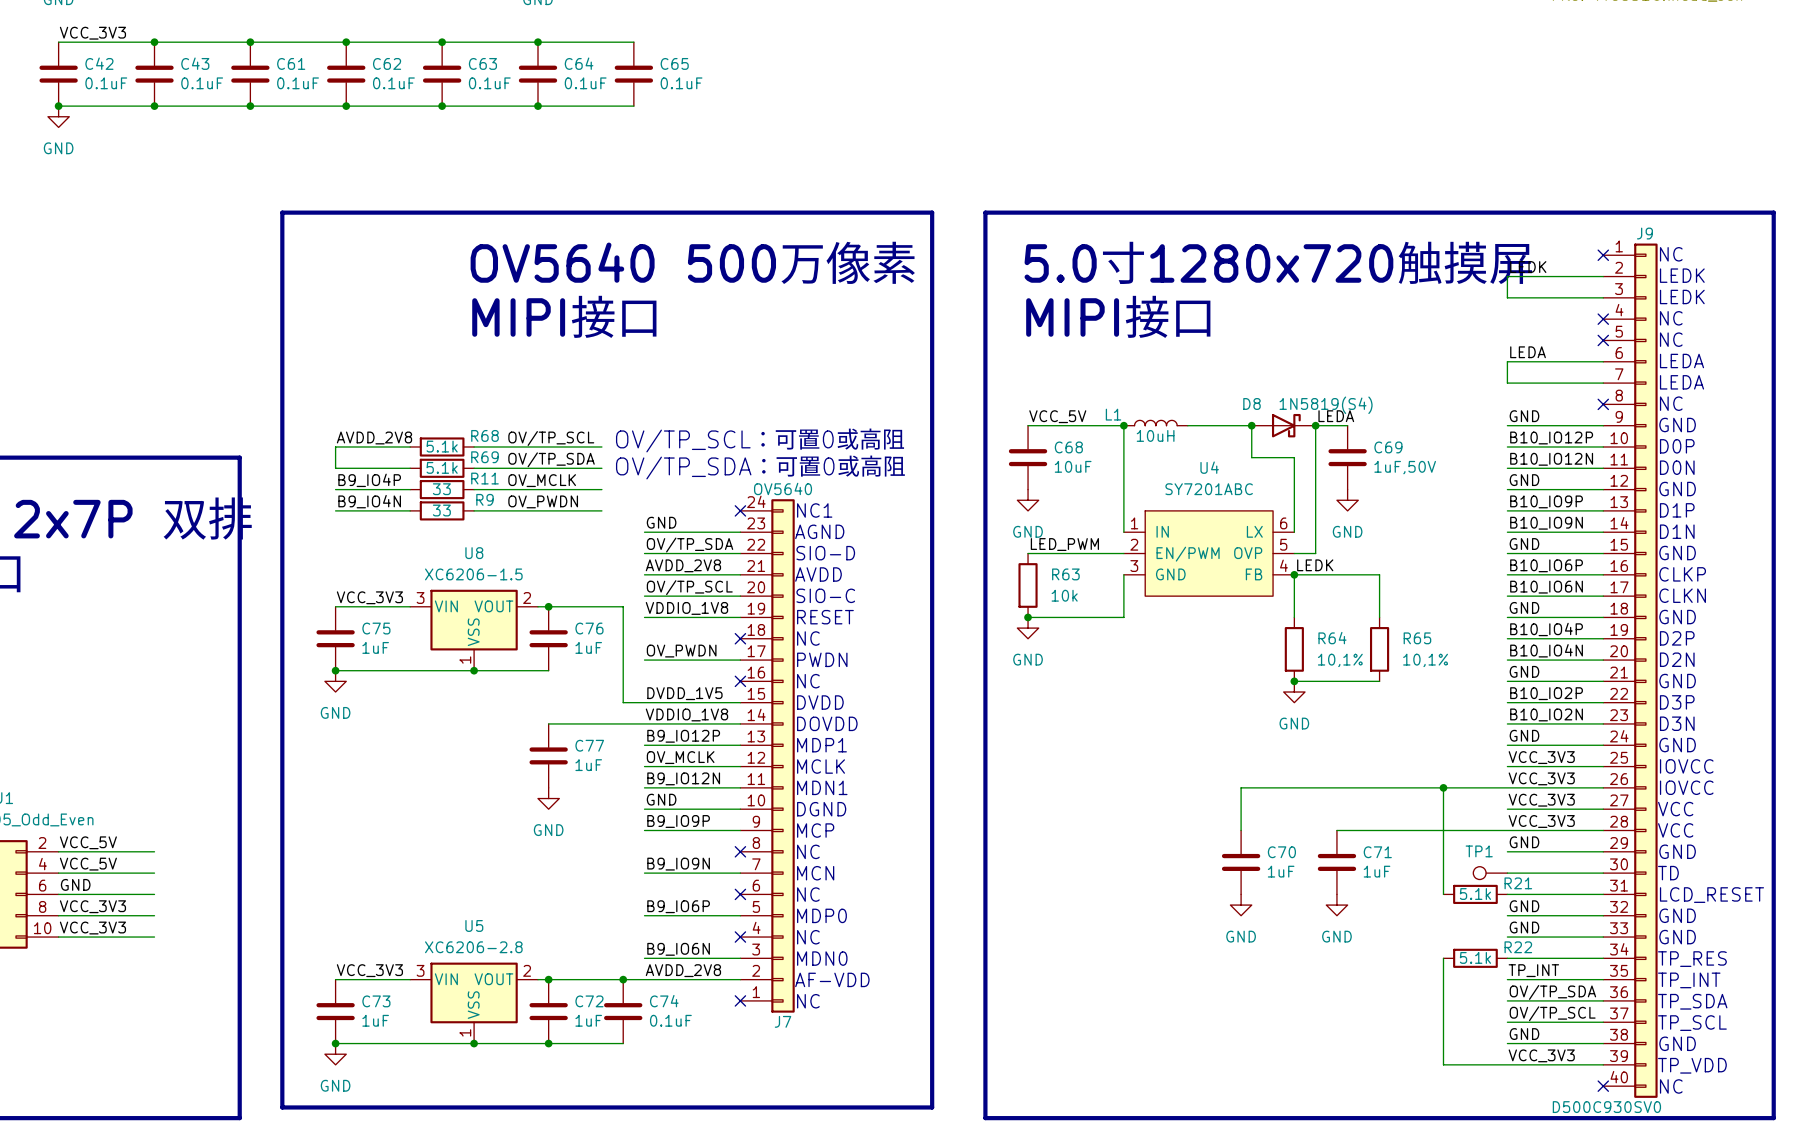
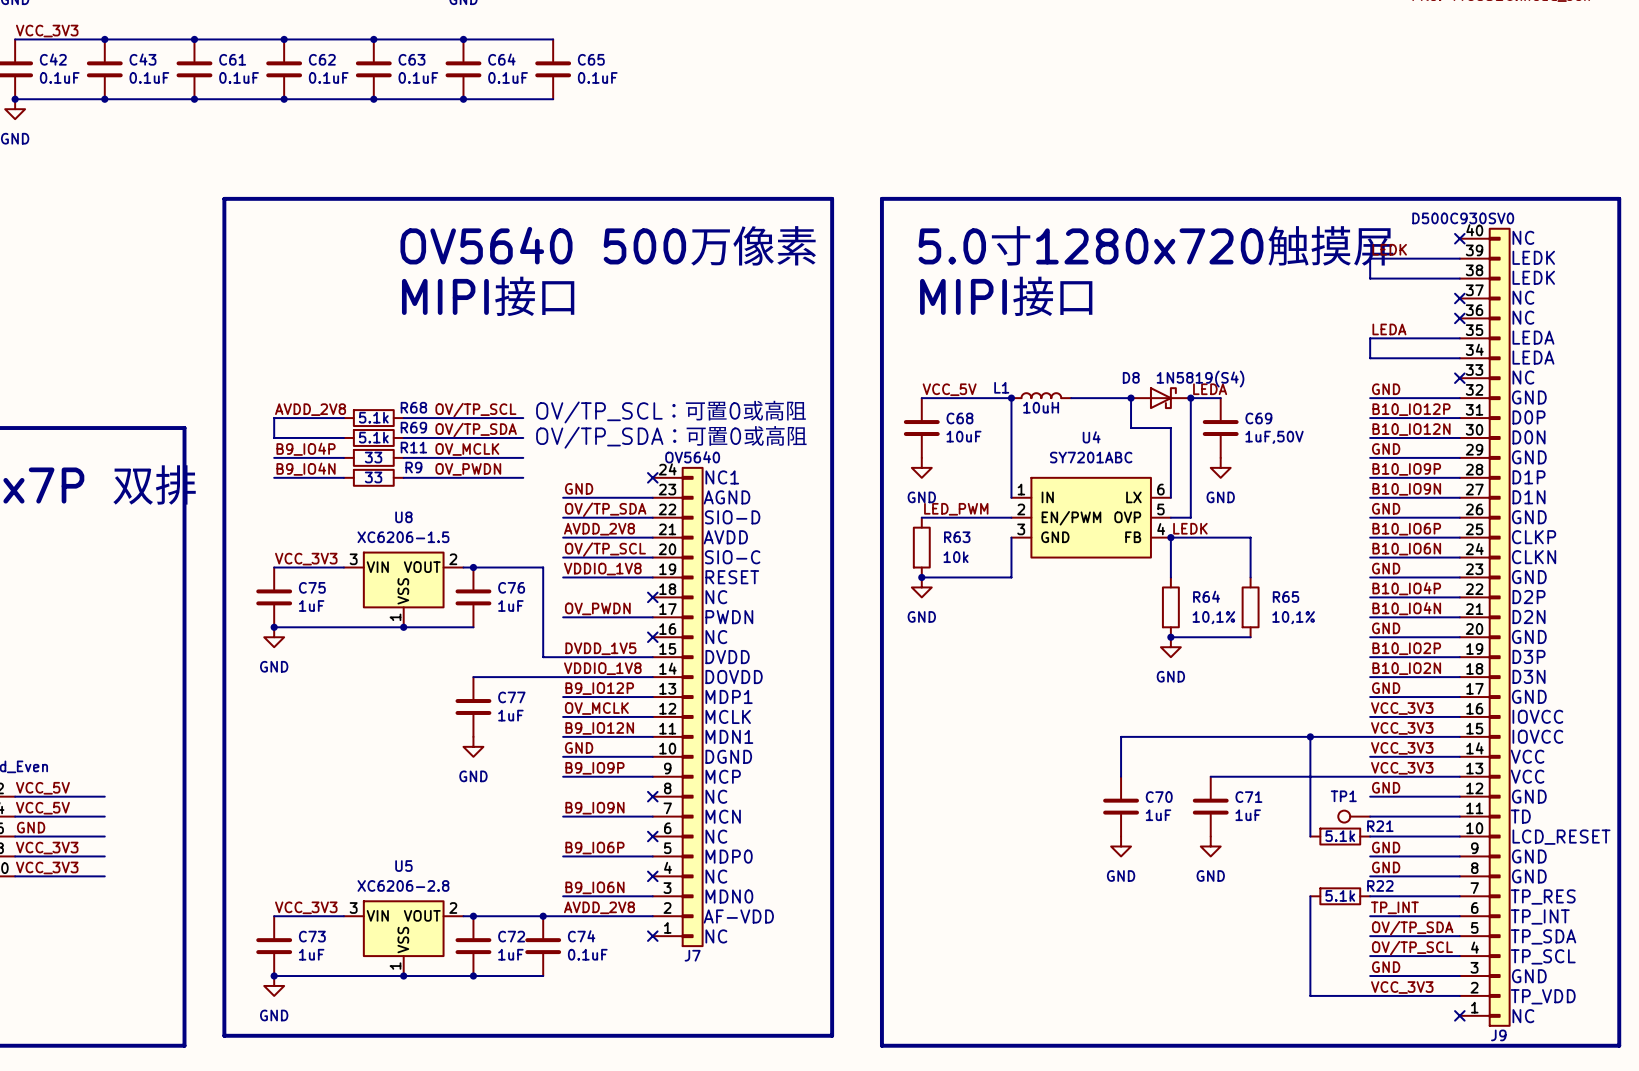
J9 flip: as is (1645, 670) -> up-down (1499, 627)

